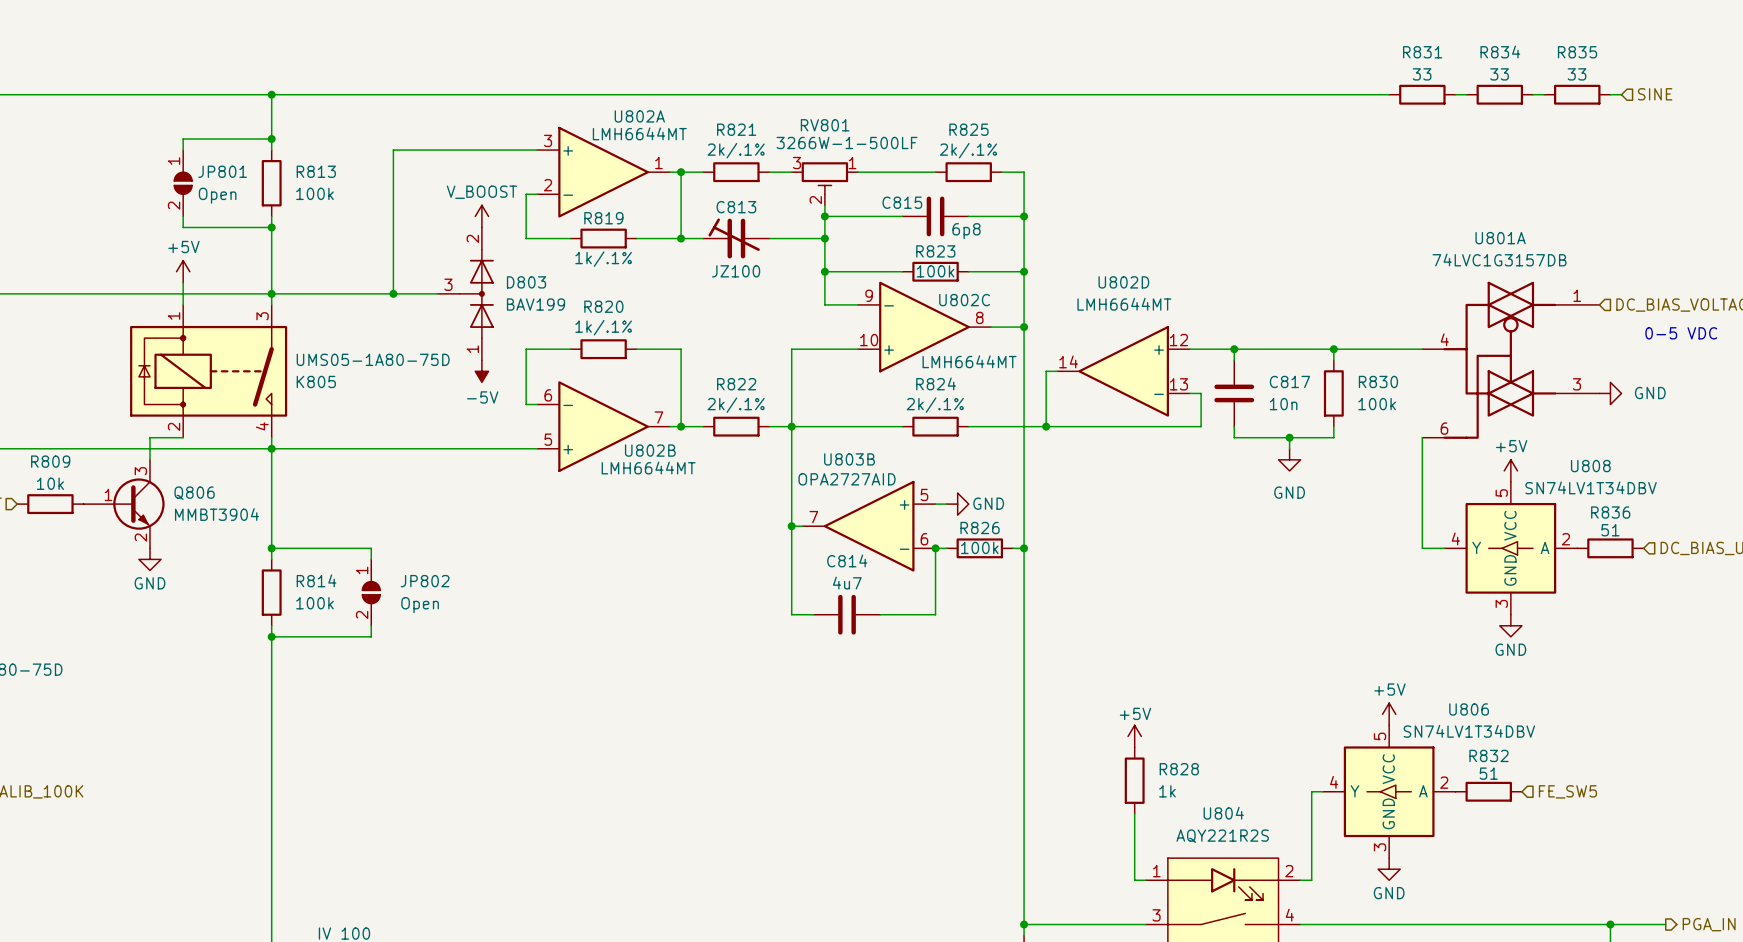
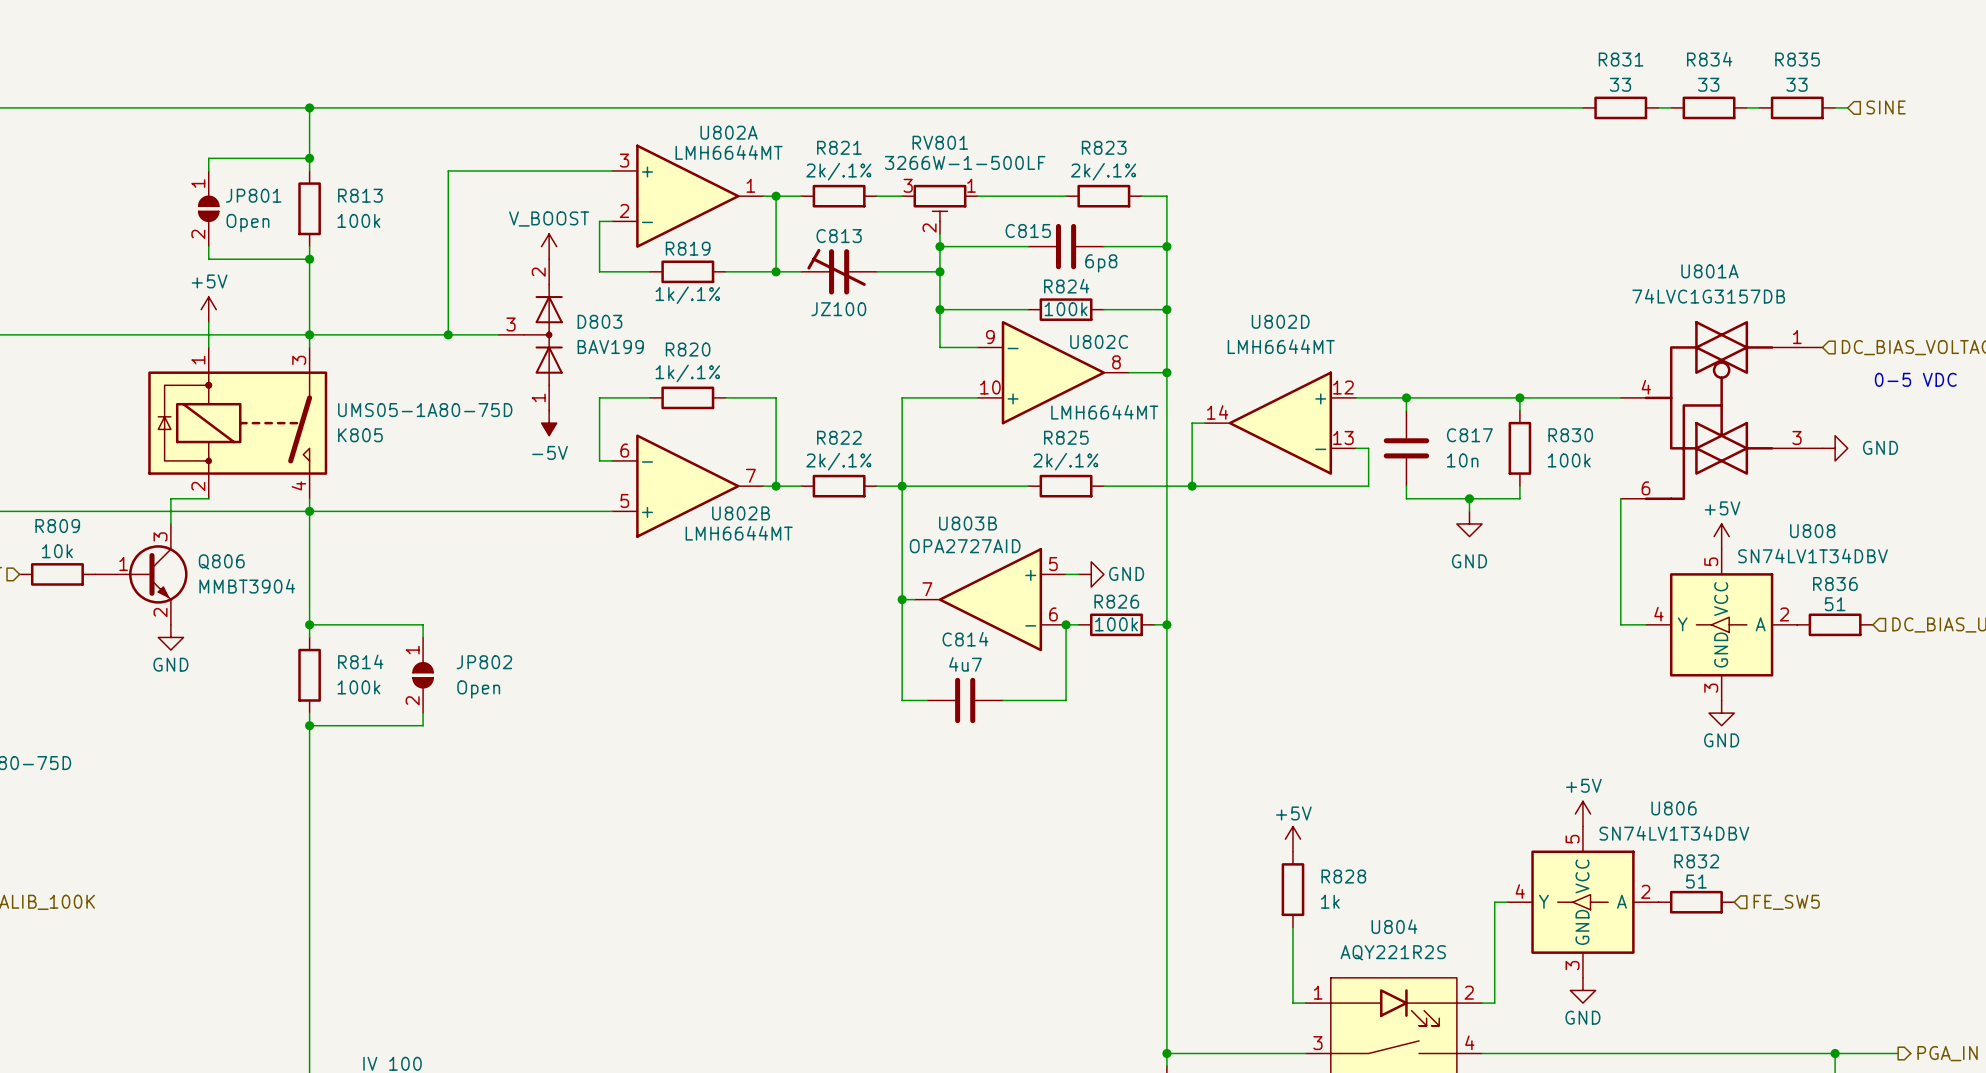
R825 name: R825 (968, 129) -> R823 (1104, 147)
R823 name: R823 (935, 251) -> R824 (1066, 286)
R824 name: R824 (936, 383) -> R825 (1066, 437)

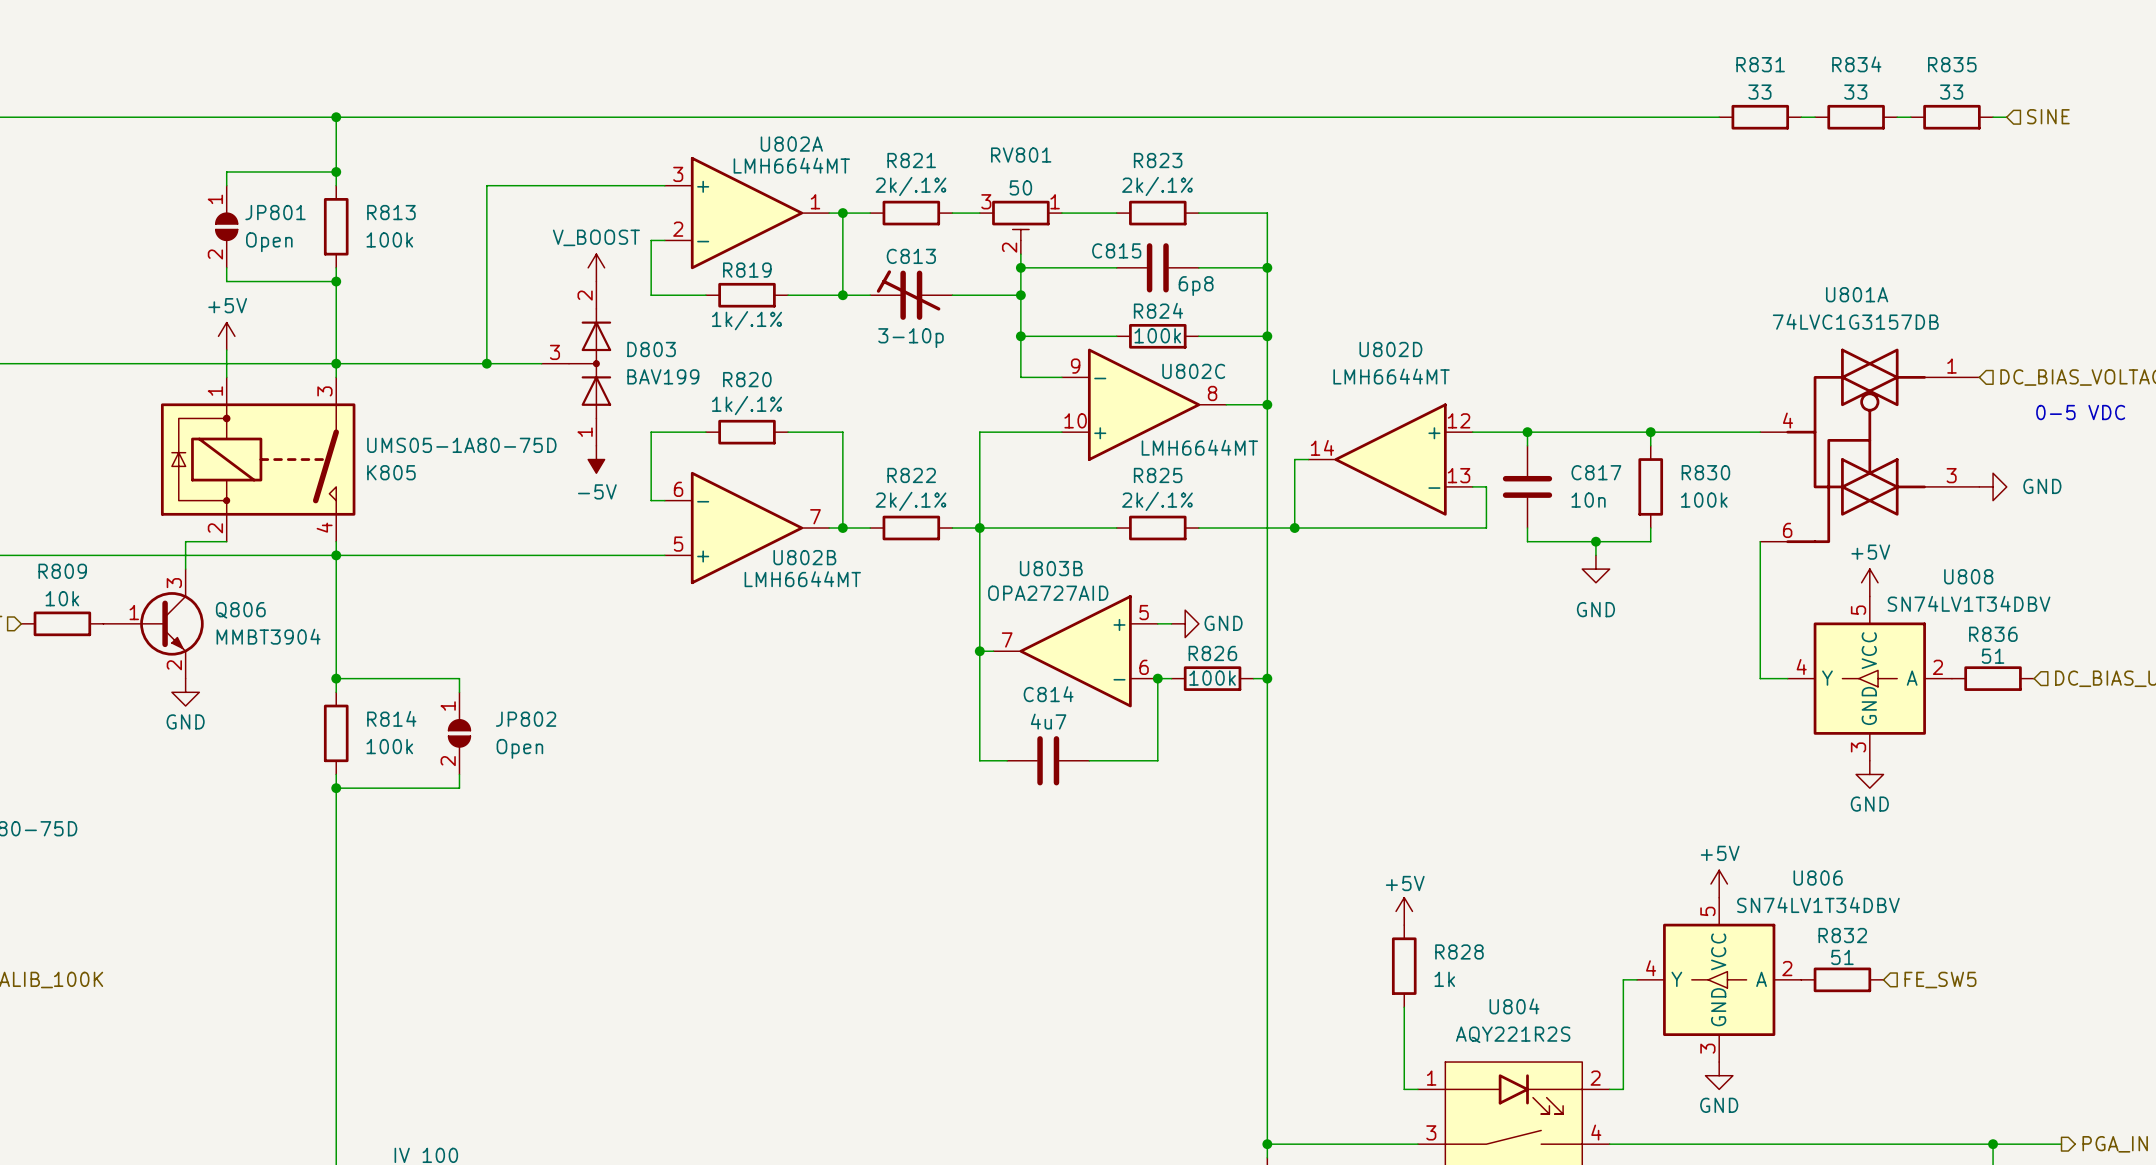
RV801 value: 3266W-1-500LF (965, 162) -> 50 (1020, 187)
wire: (1028, 196) (1066, 196) -> (1198, 213) (1239, 213)
R823 position: (1103, 196) -> (1157, 213)
C813 value: JZ100 (838, 309) -> 3-10p (911, 338)

